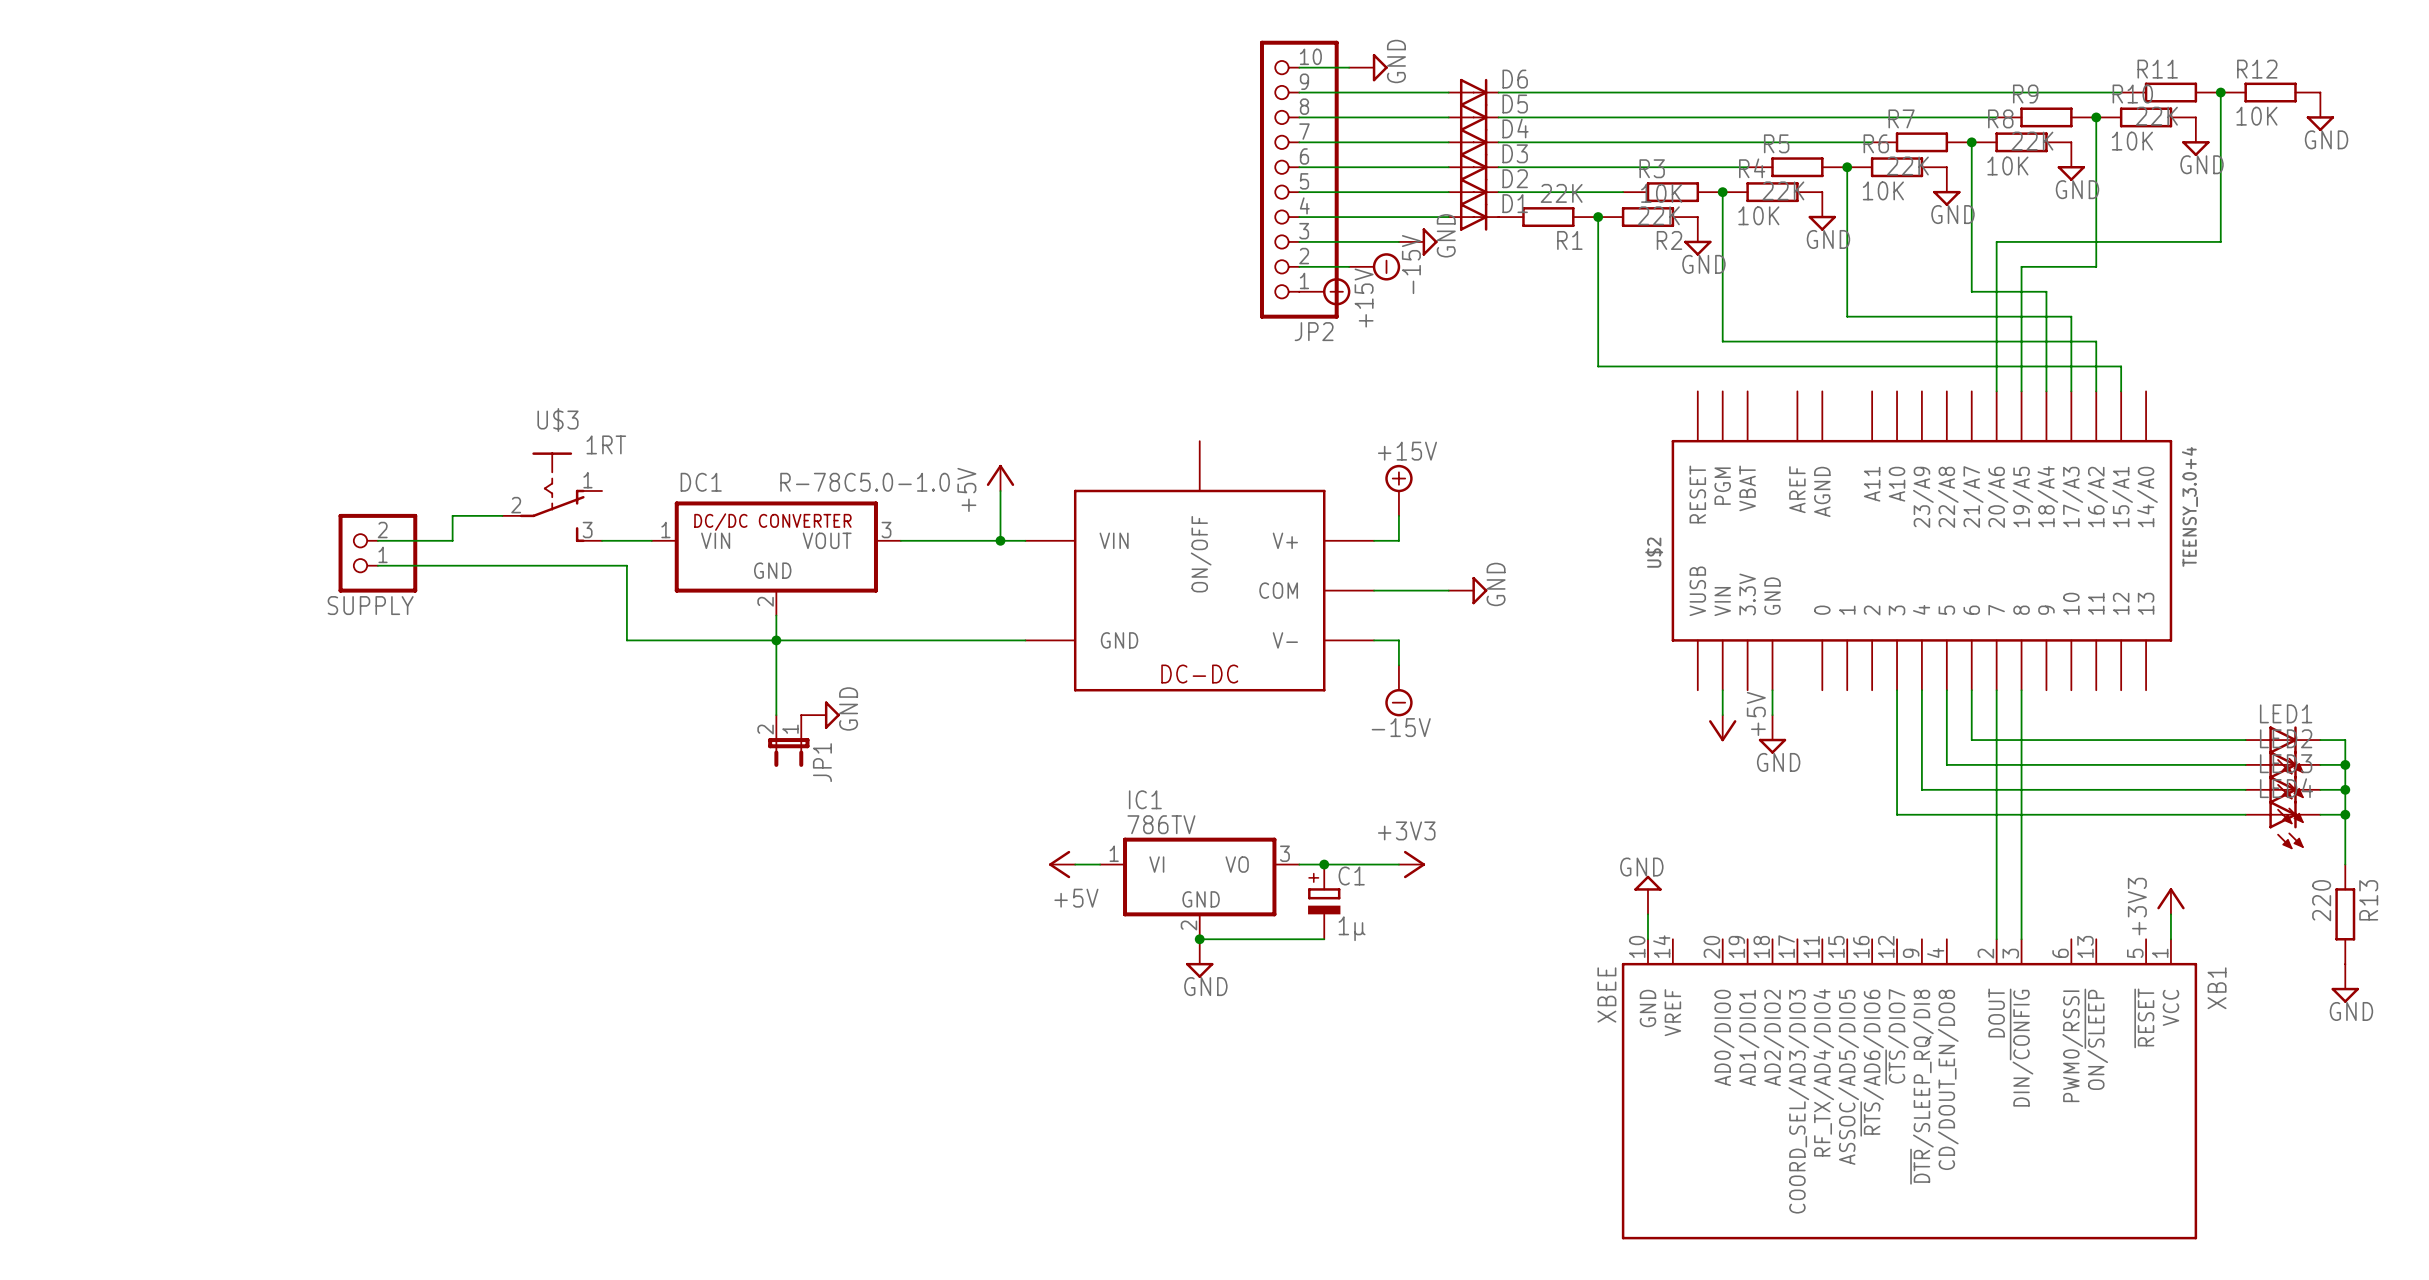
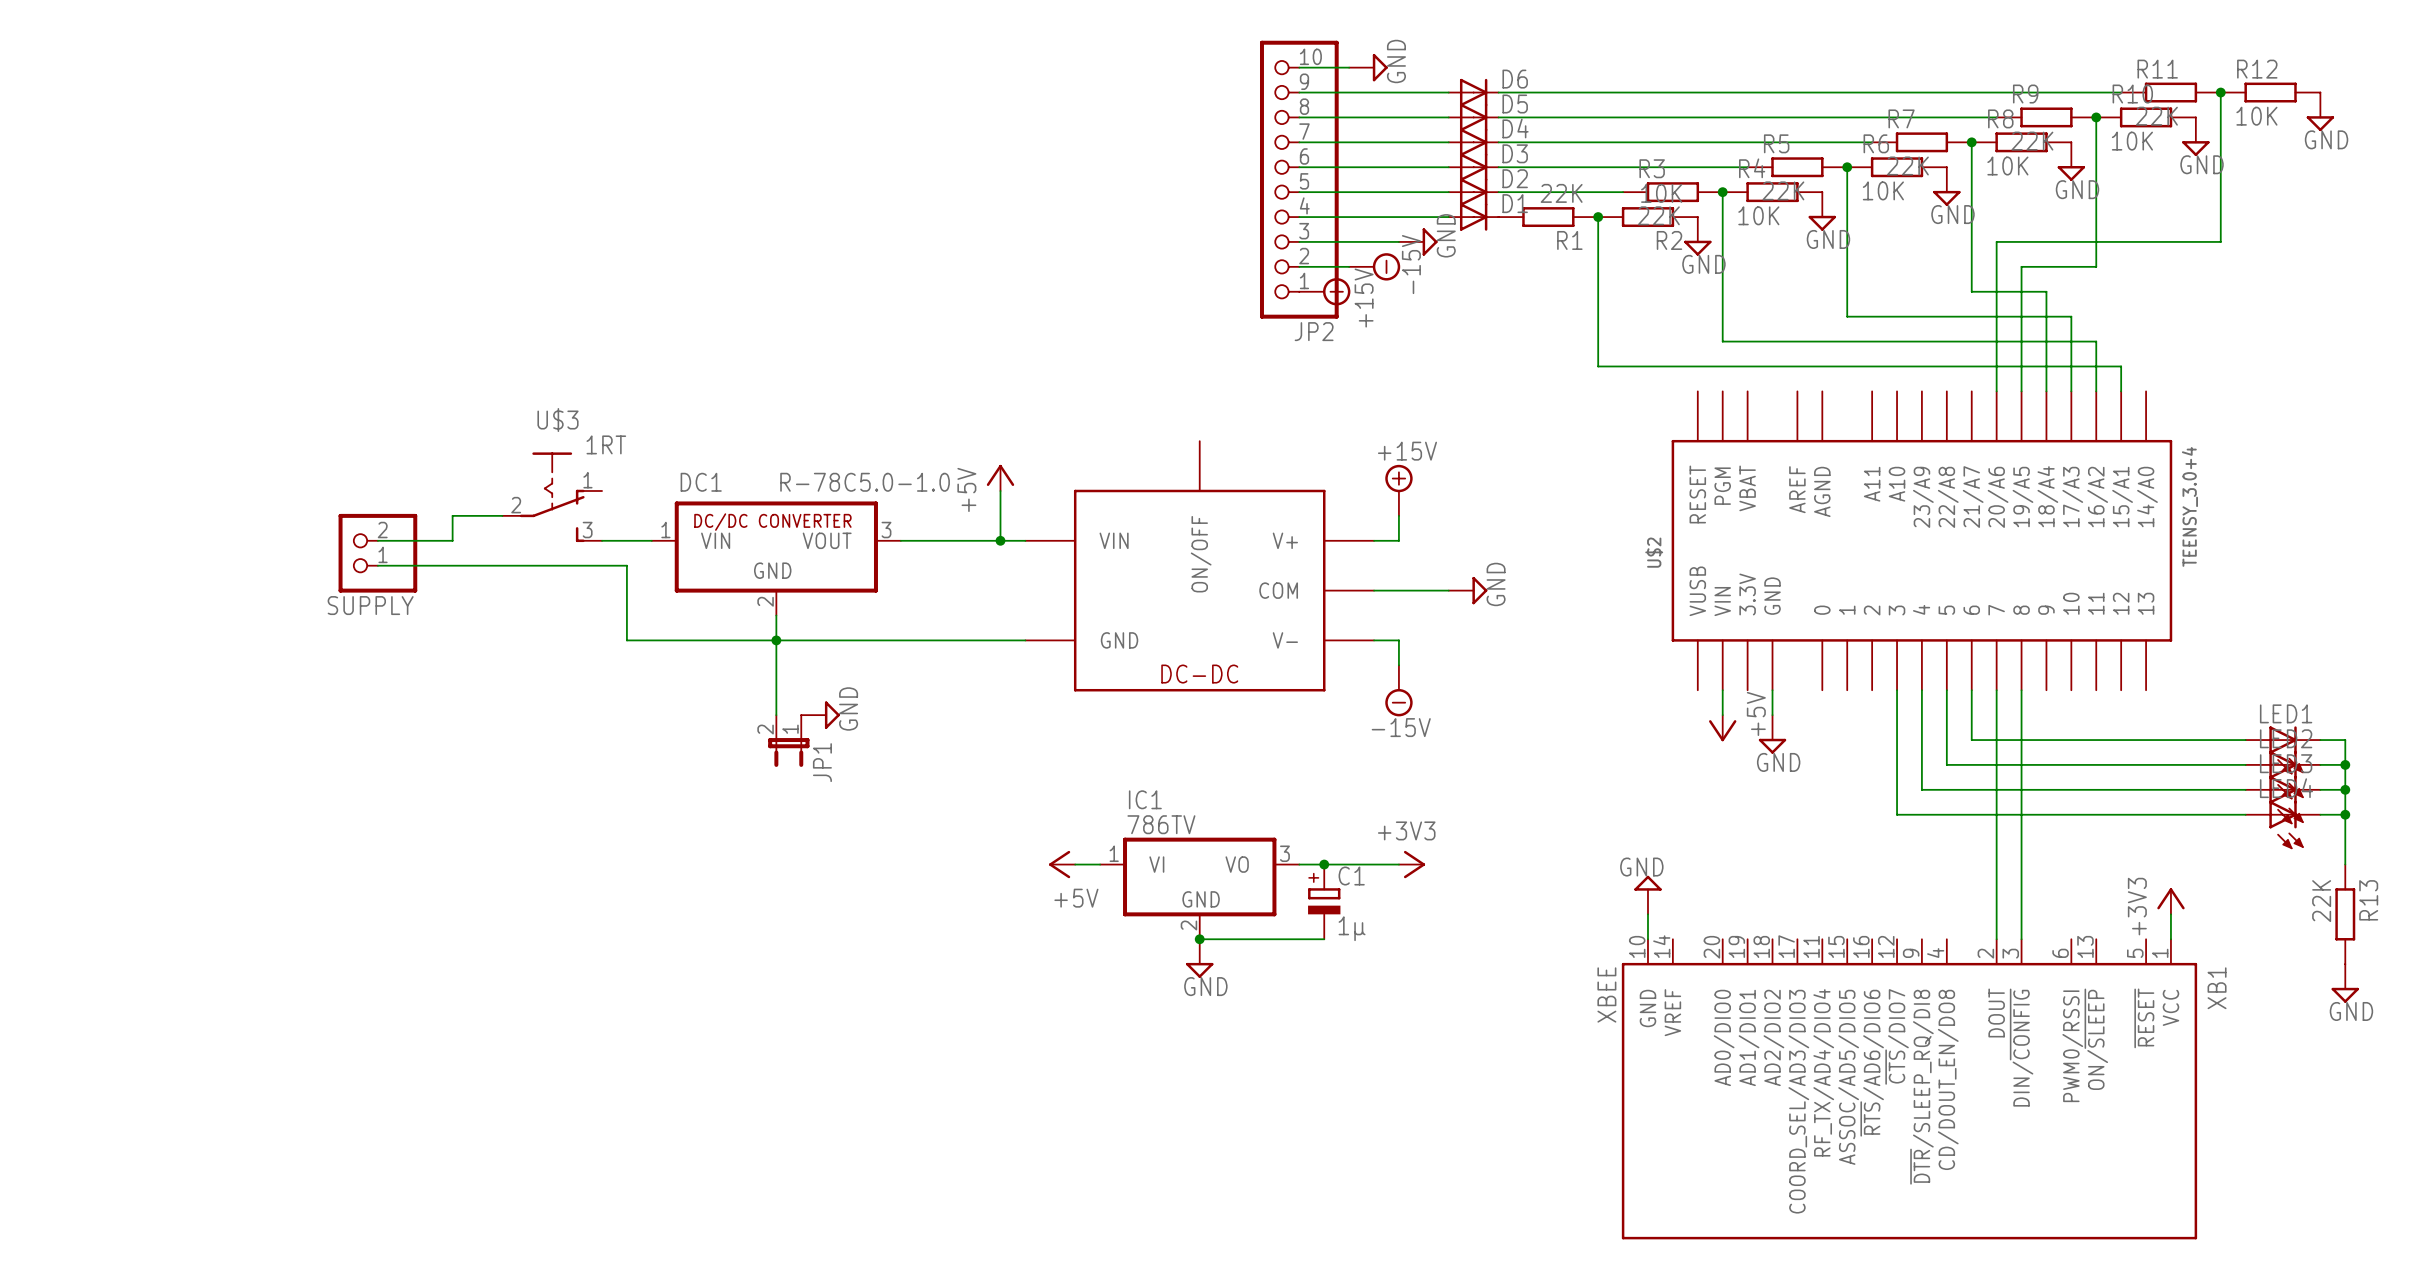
R13 value: 220 (2321, 900) -> 22K (2321, 901)

